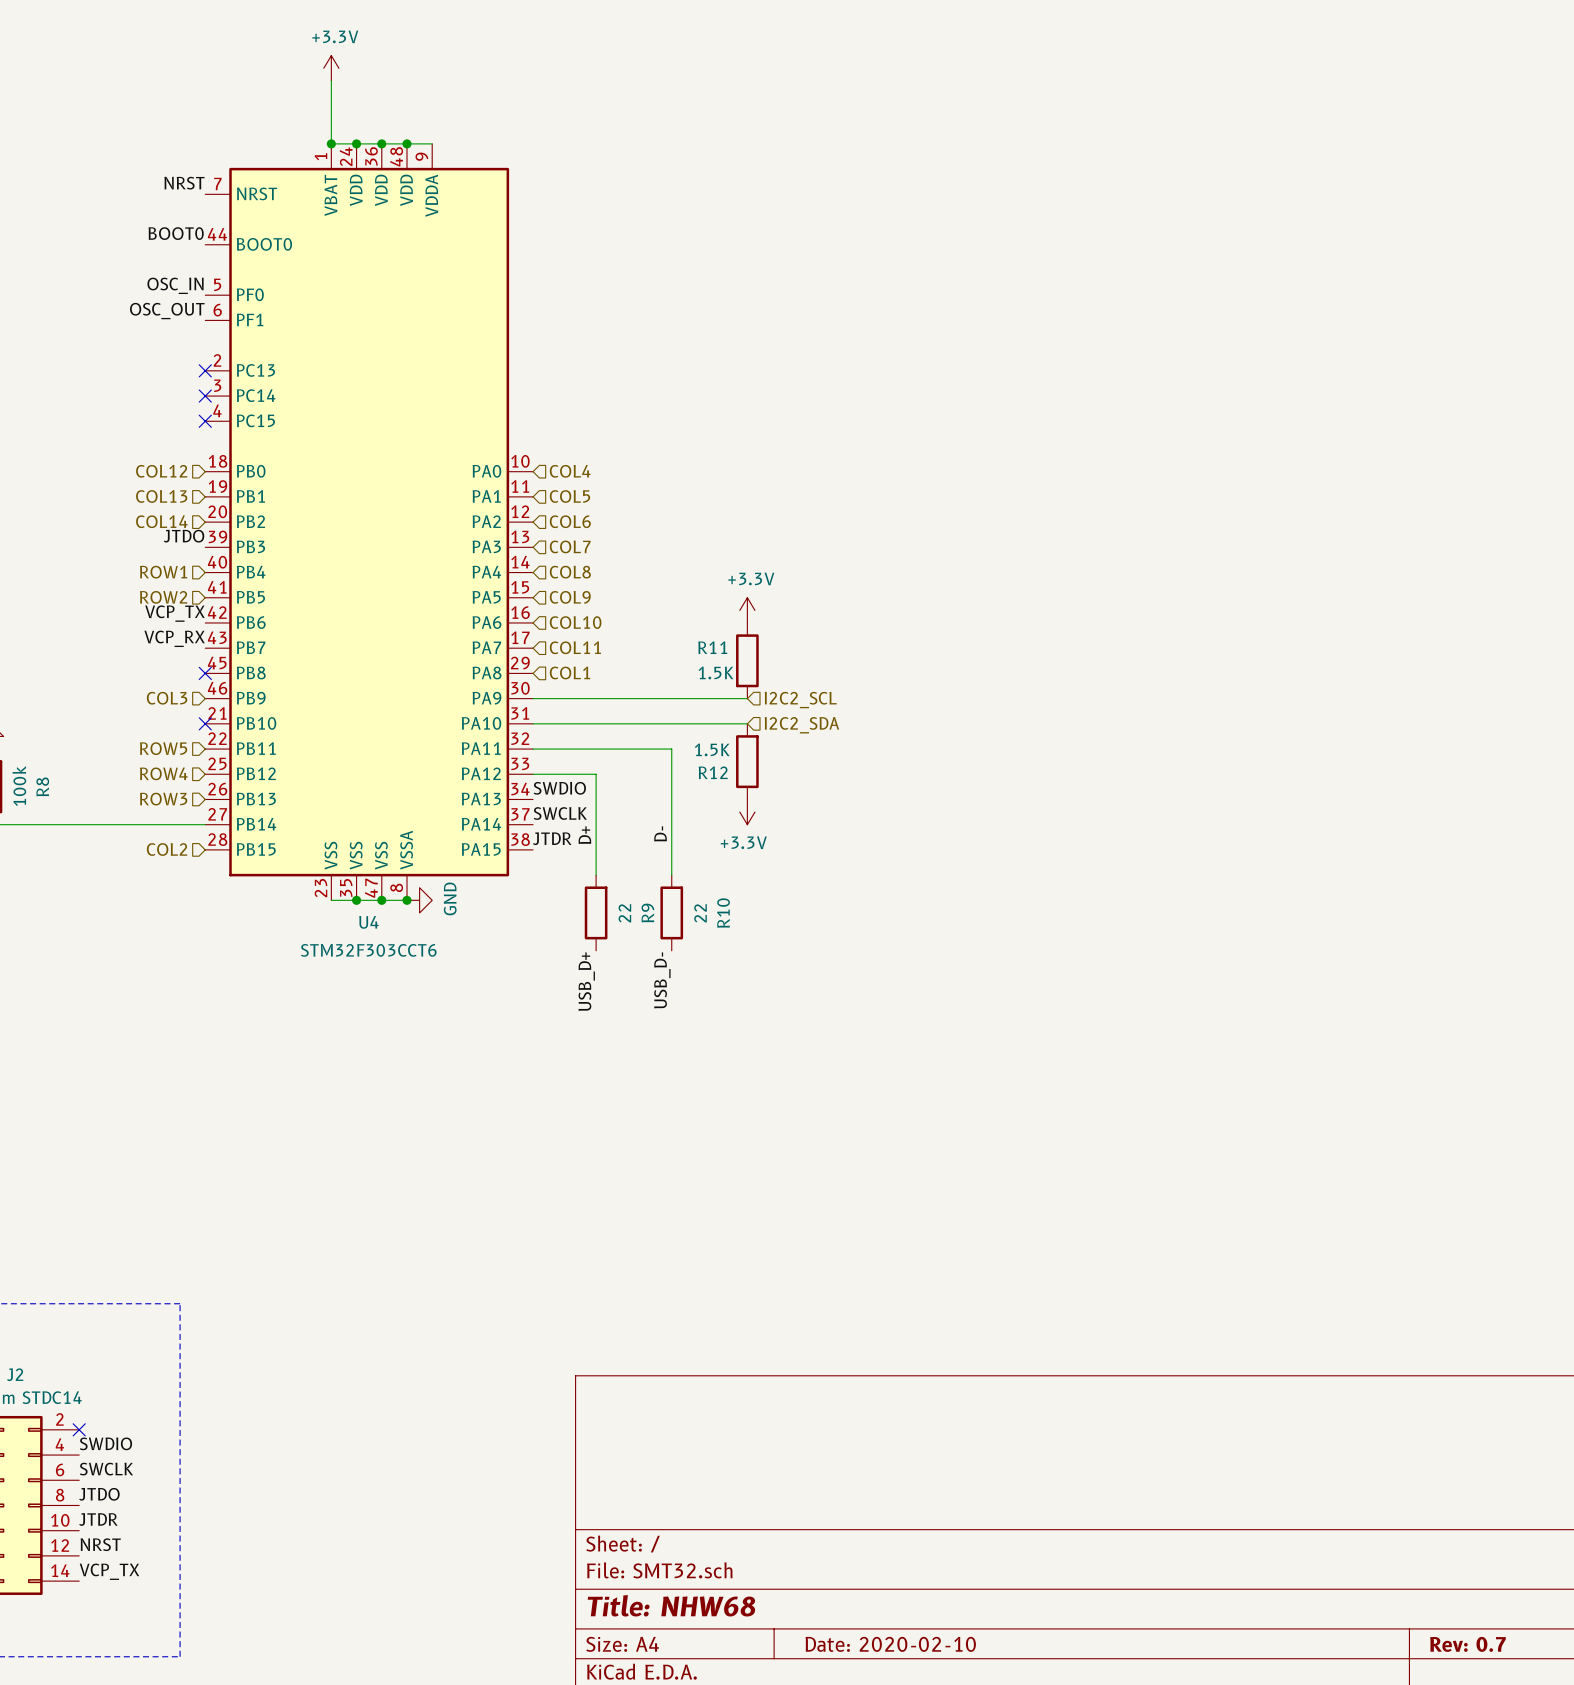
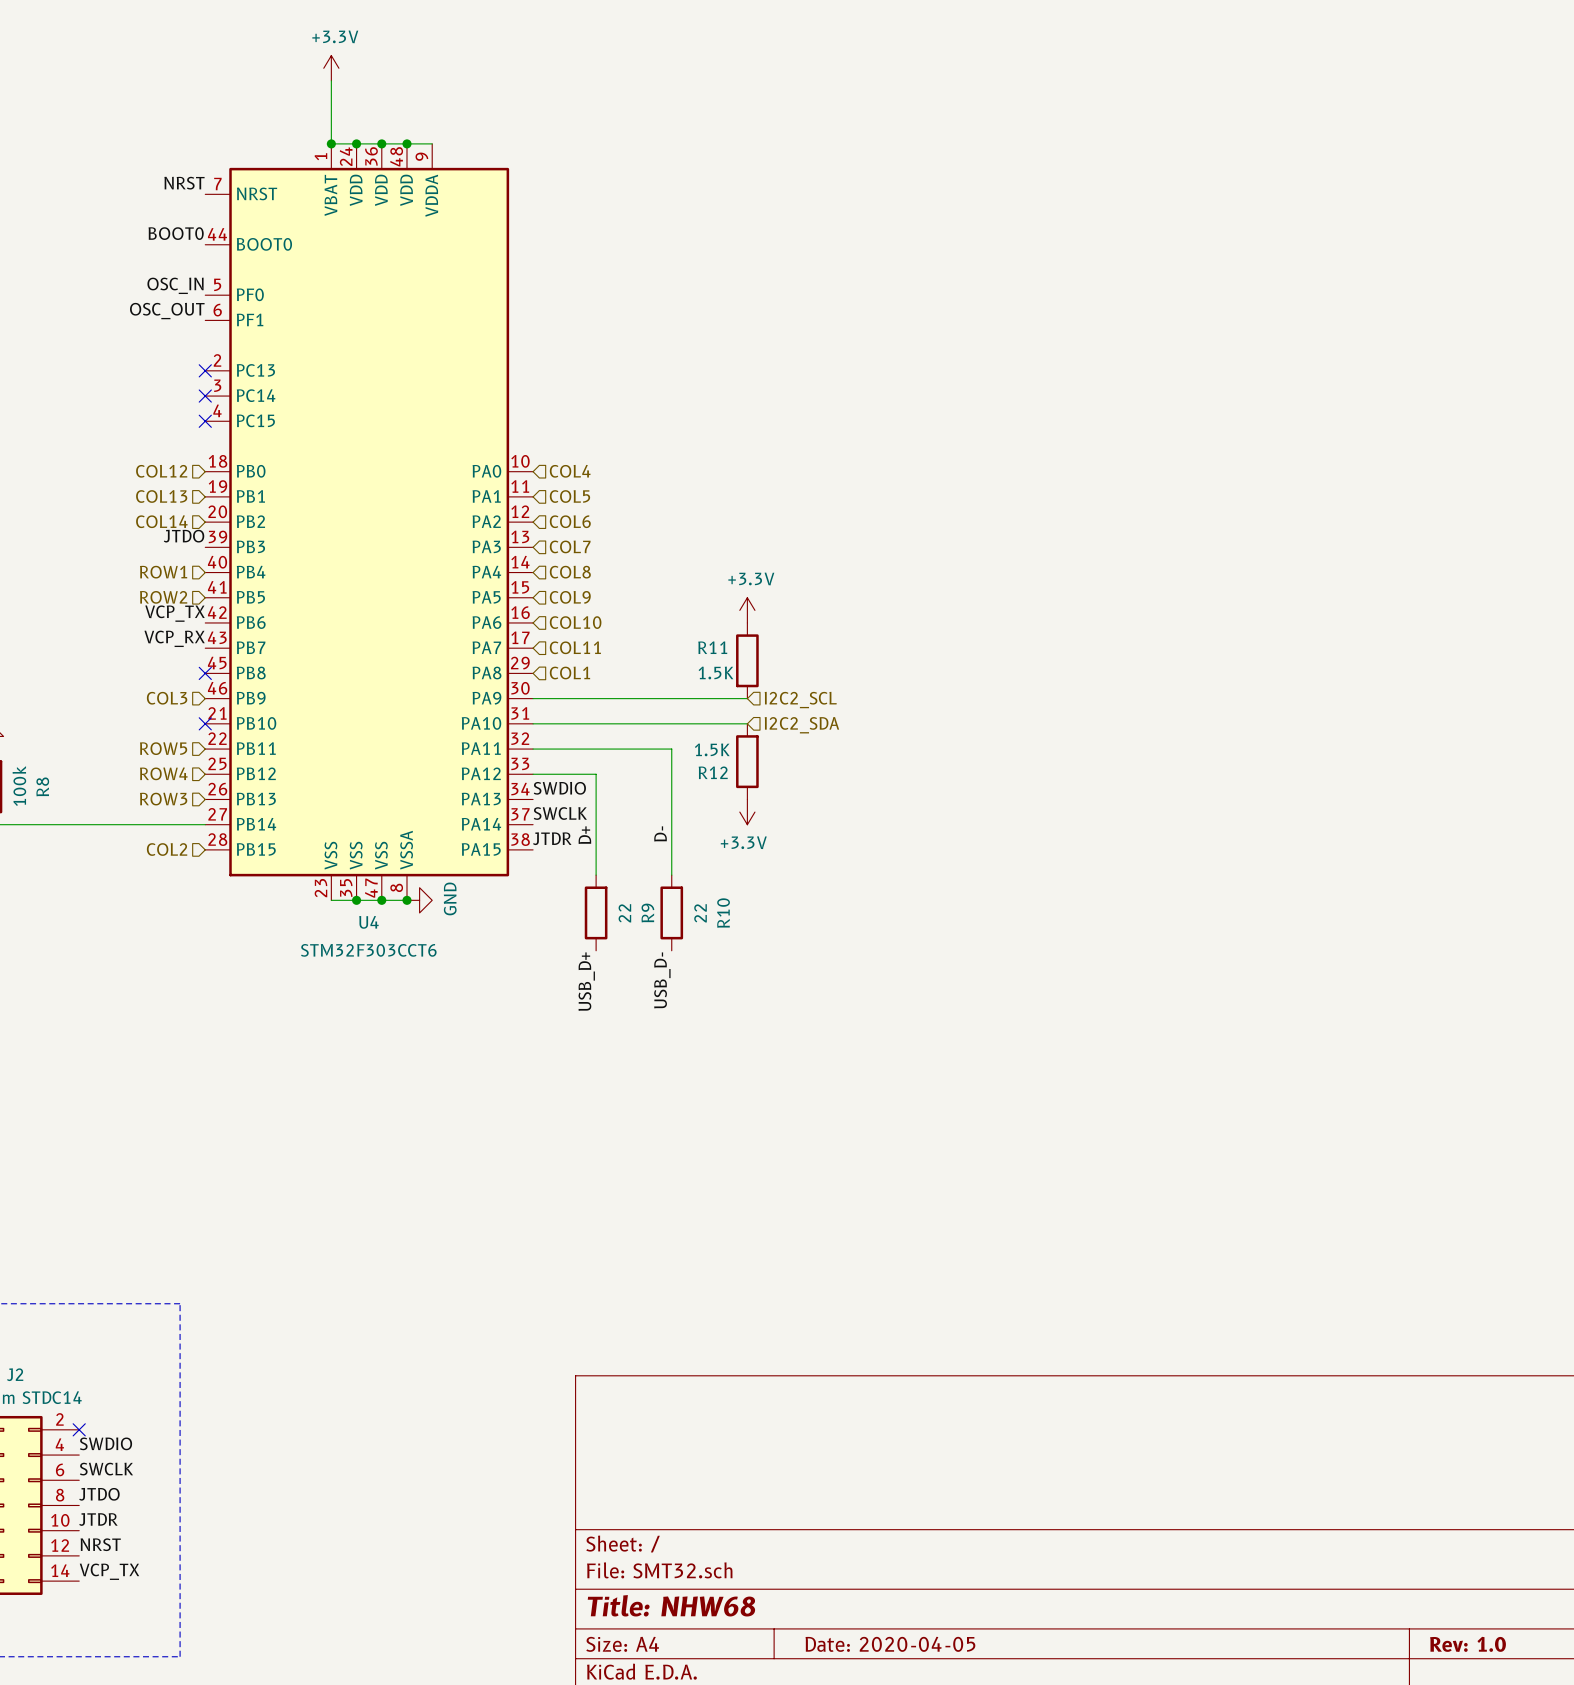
title block: Date: 2020-02-10 (890, 1644) -> Date: 2020-04-05 (890, 1644)
title block: Rev: 0.7 (1467, 1644) -> Rev: 1.0 (1468, 1644)

